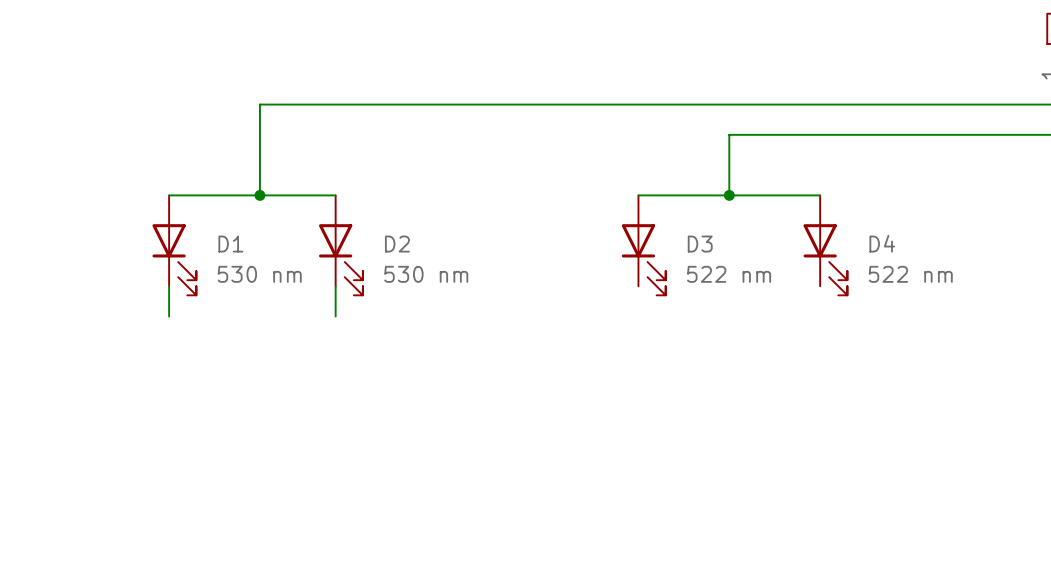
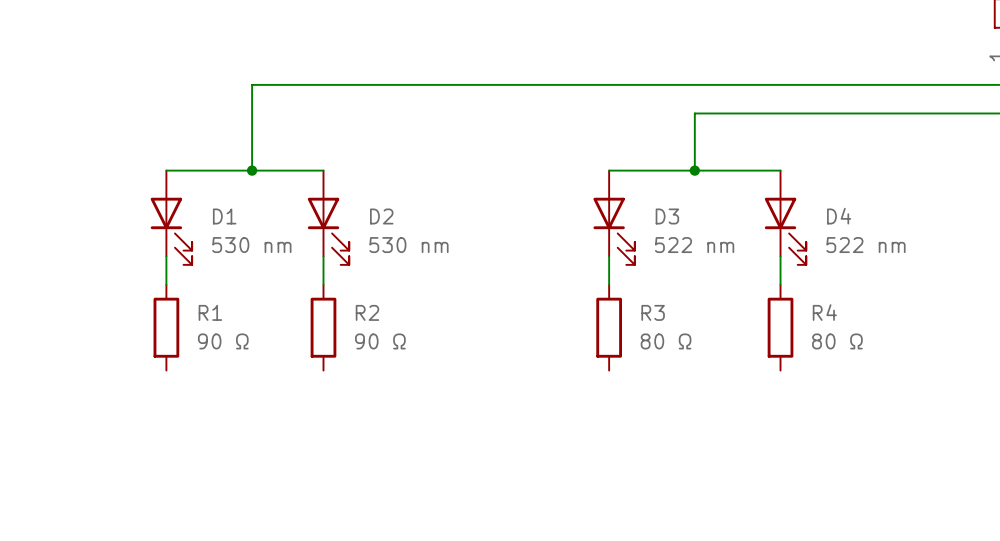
wire: none -> (609, 256) (609, 284)
wire: none -> (780, 256) (780, 284)
R1: none -> 90 Ω (166, 327)
R2: none -> 90 Ω (323, 327)
R3: none -> 80 Ω (609, 327)
R4: none -> 80 Ω (780, 327)

